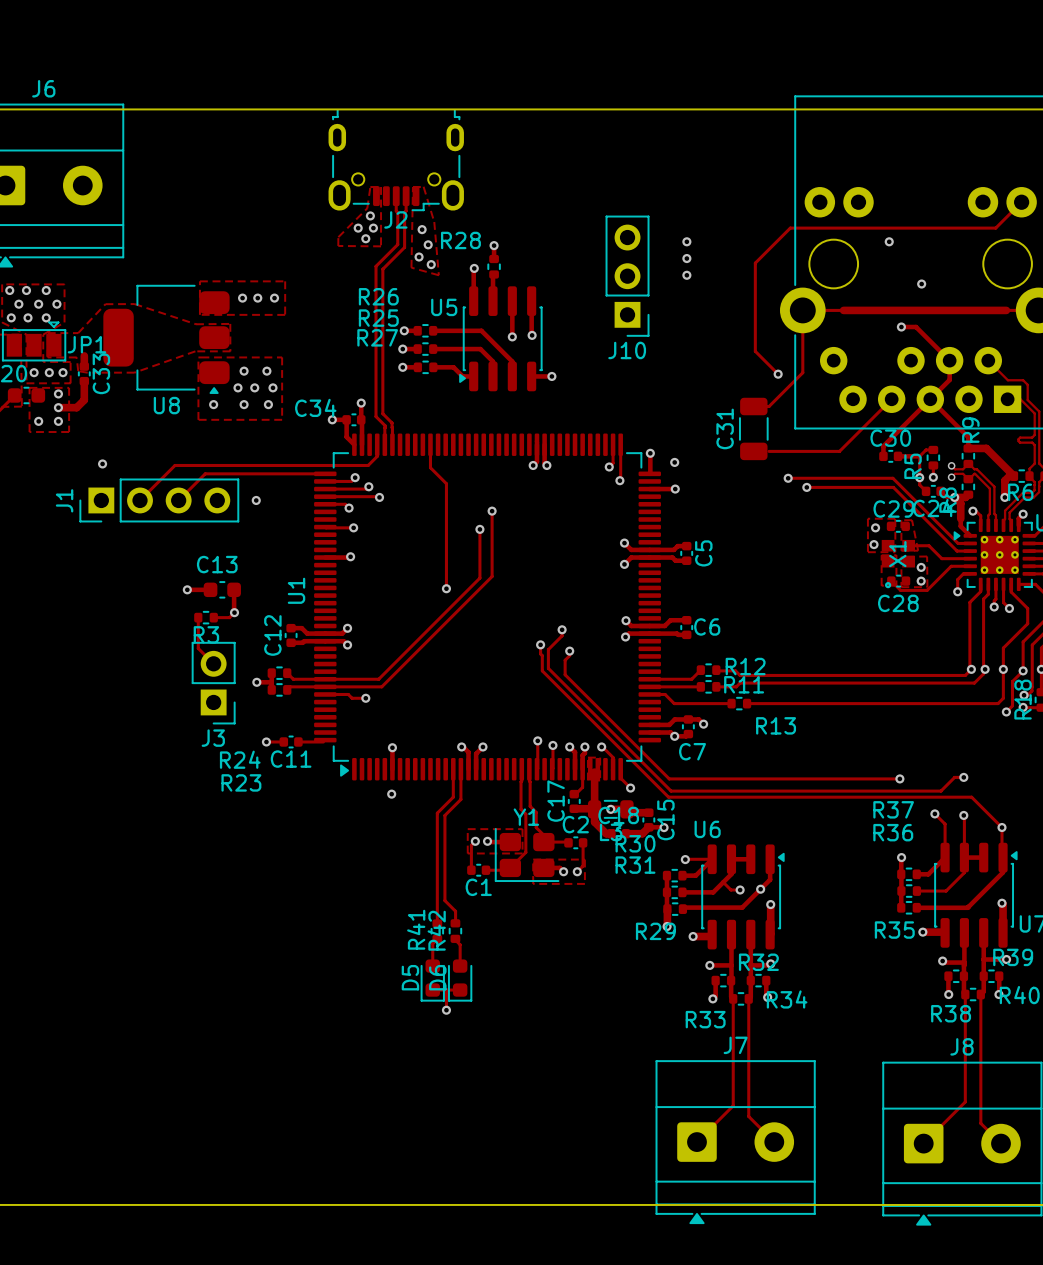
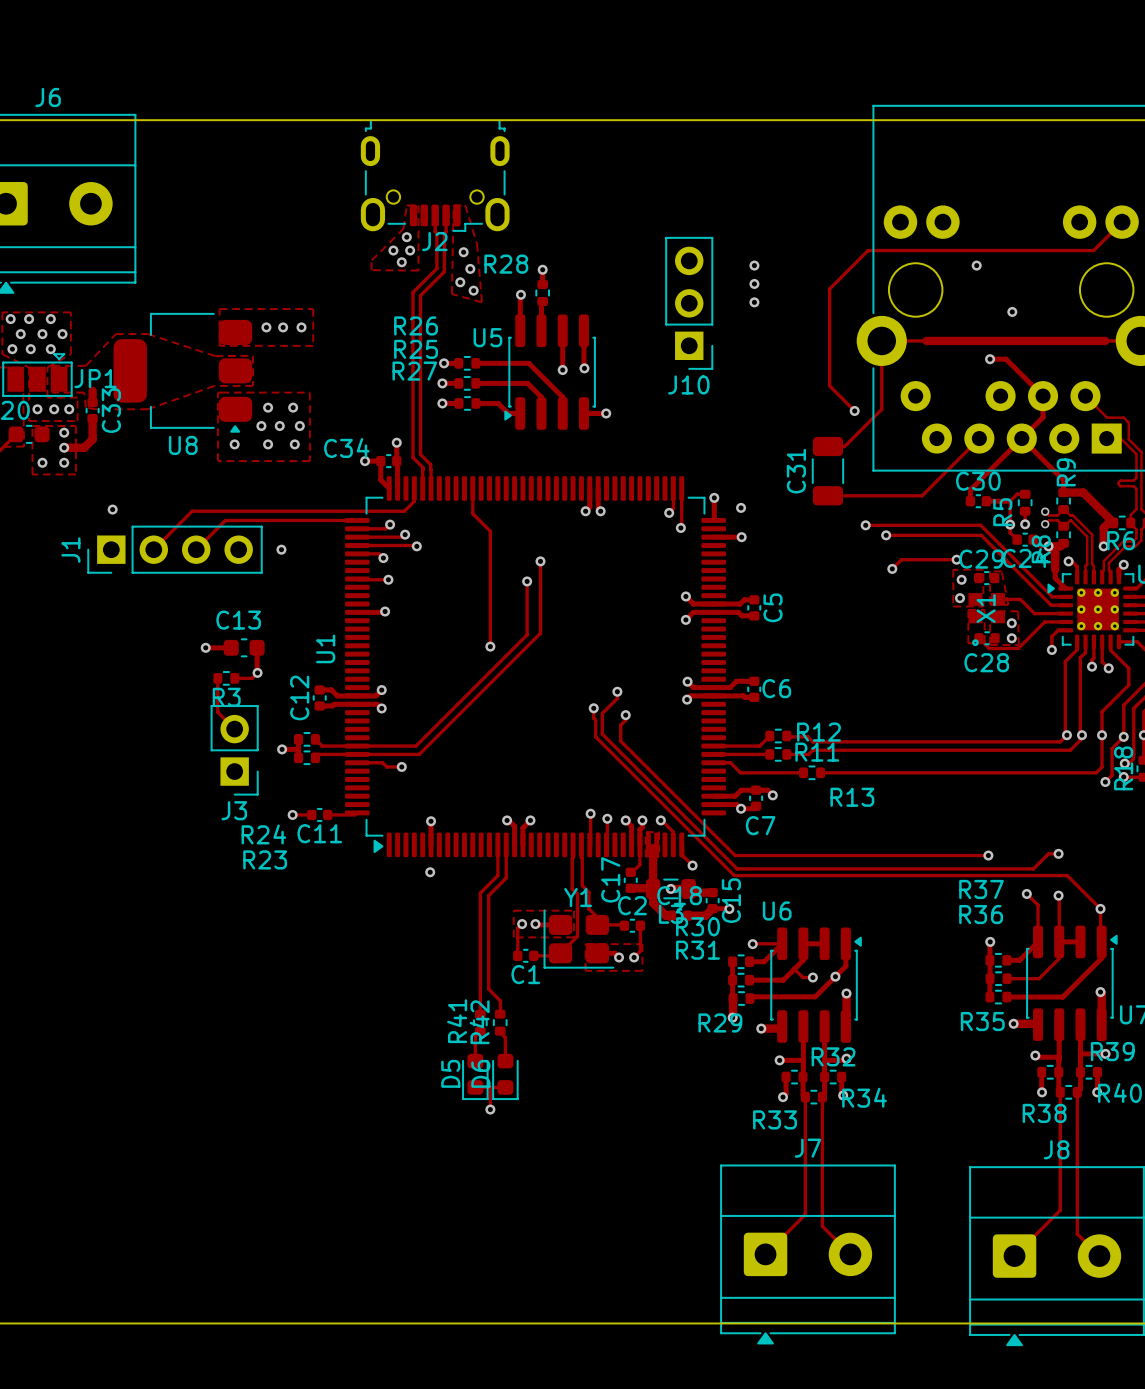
track: none -> (956, 559) (901, 559) (892, 568)
via: none -> (956, 559)
via: none -> (892, 568)

